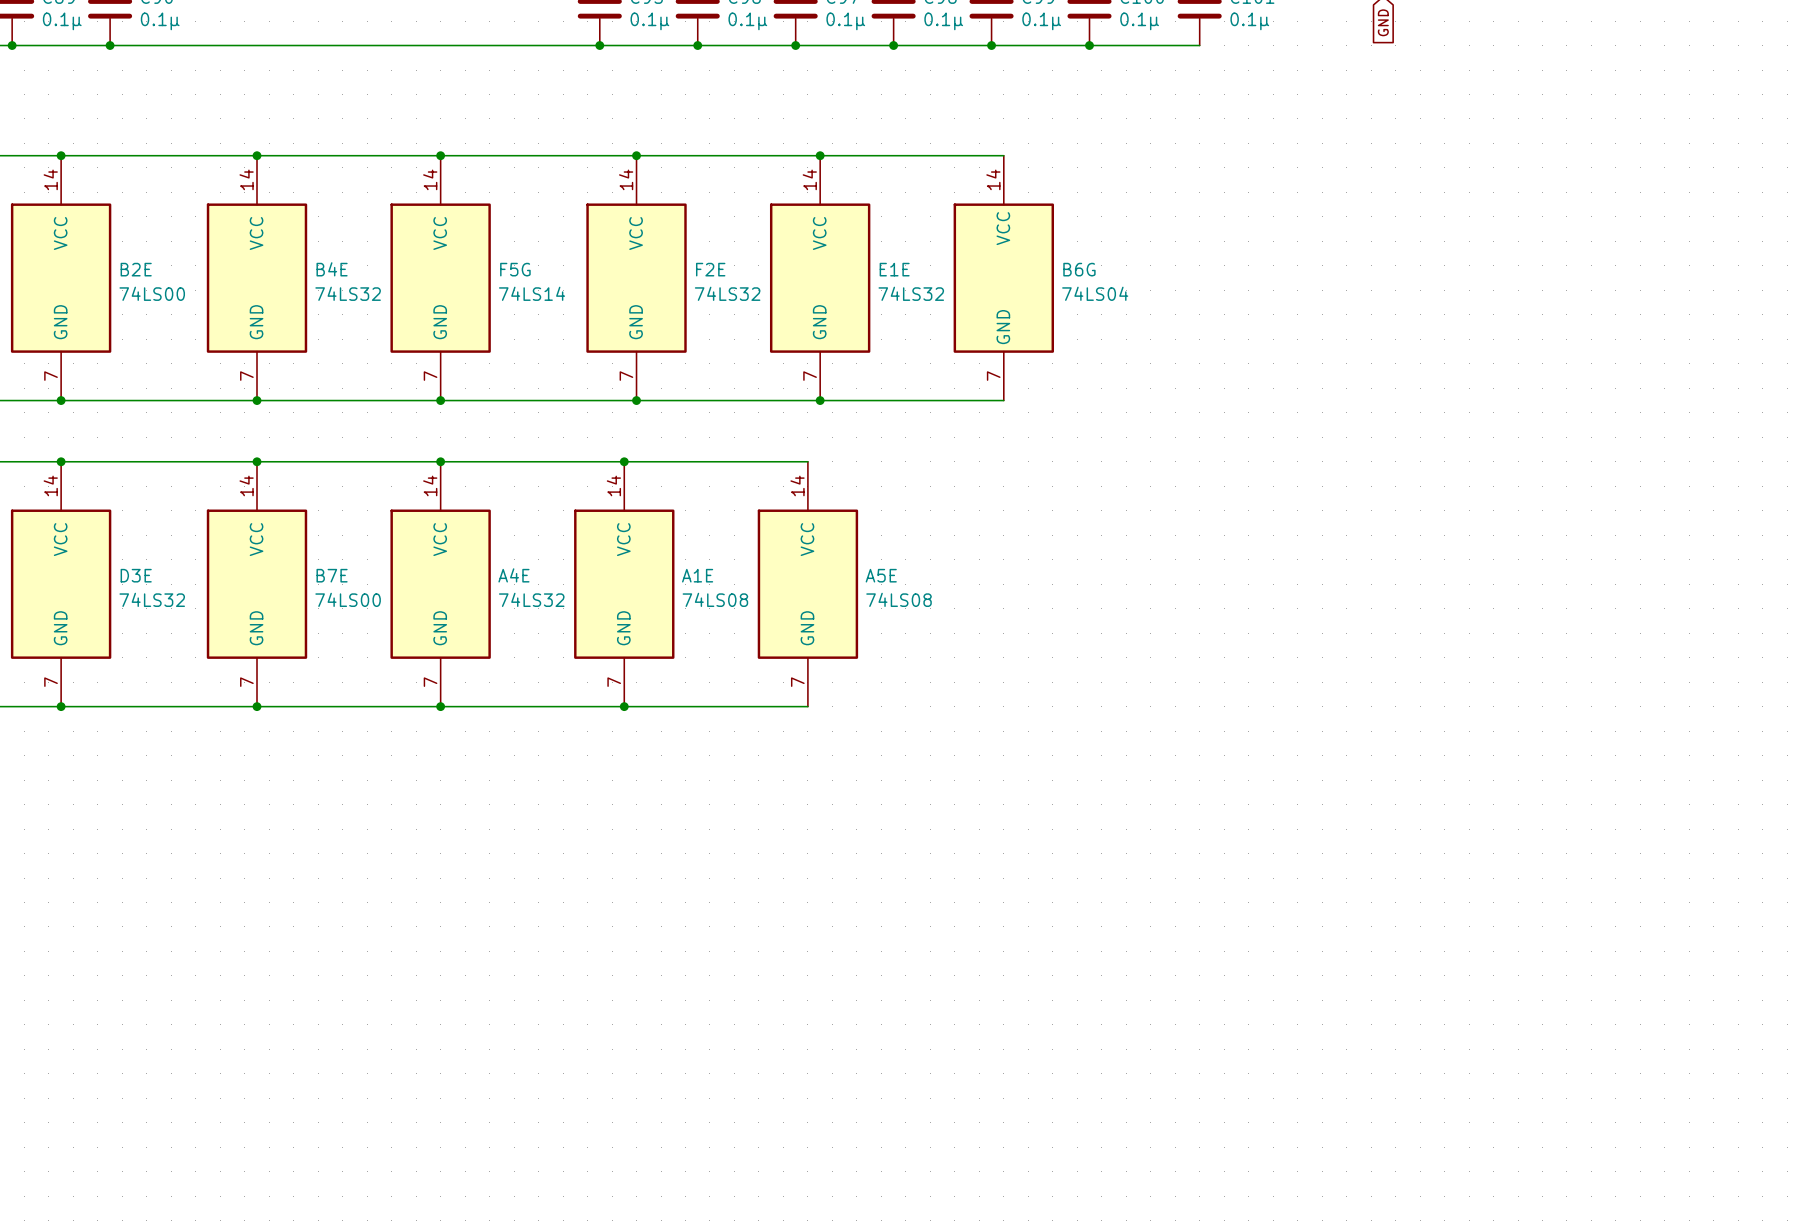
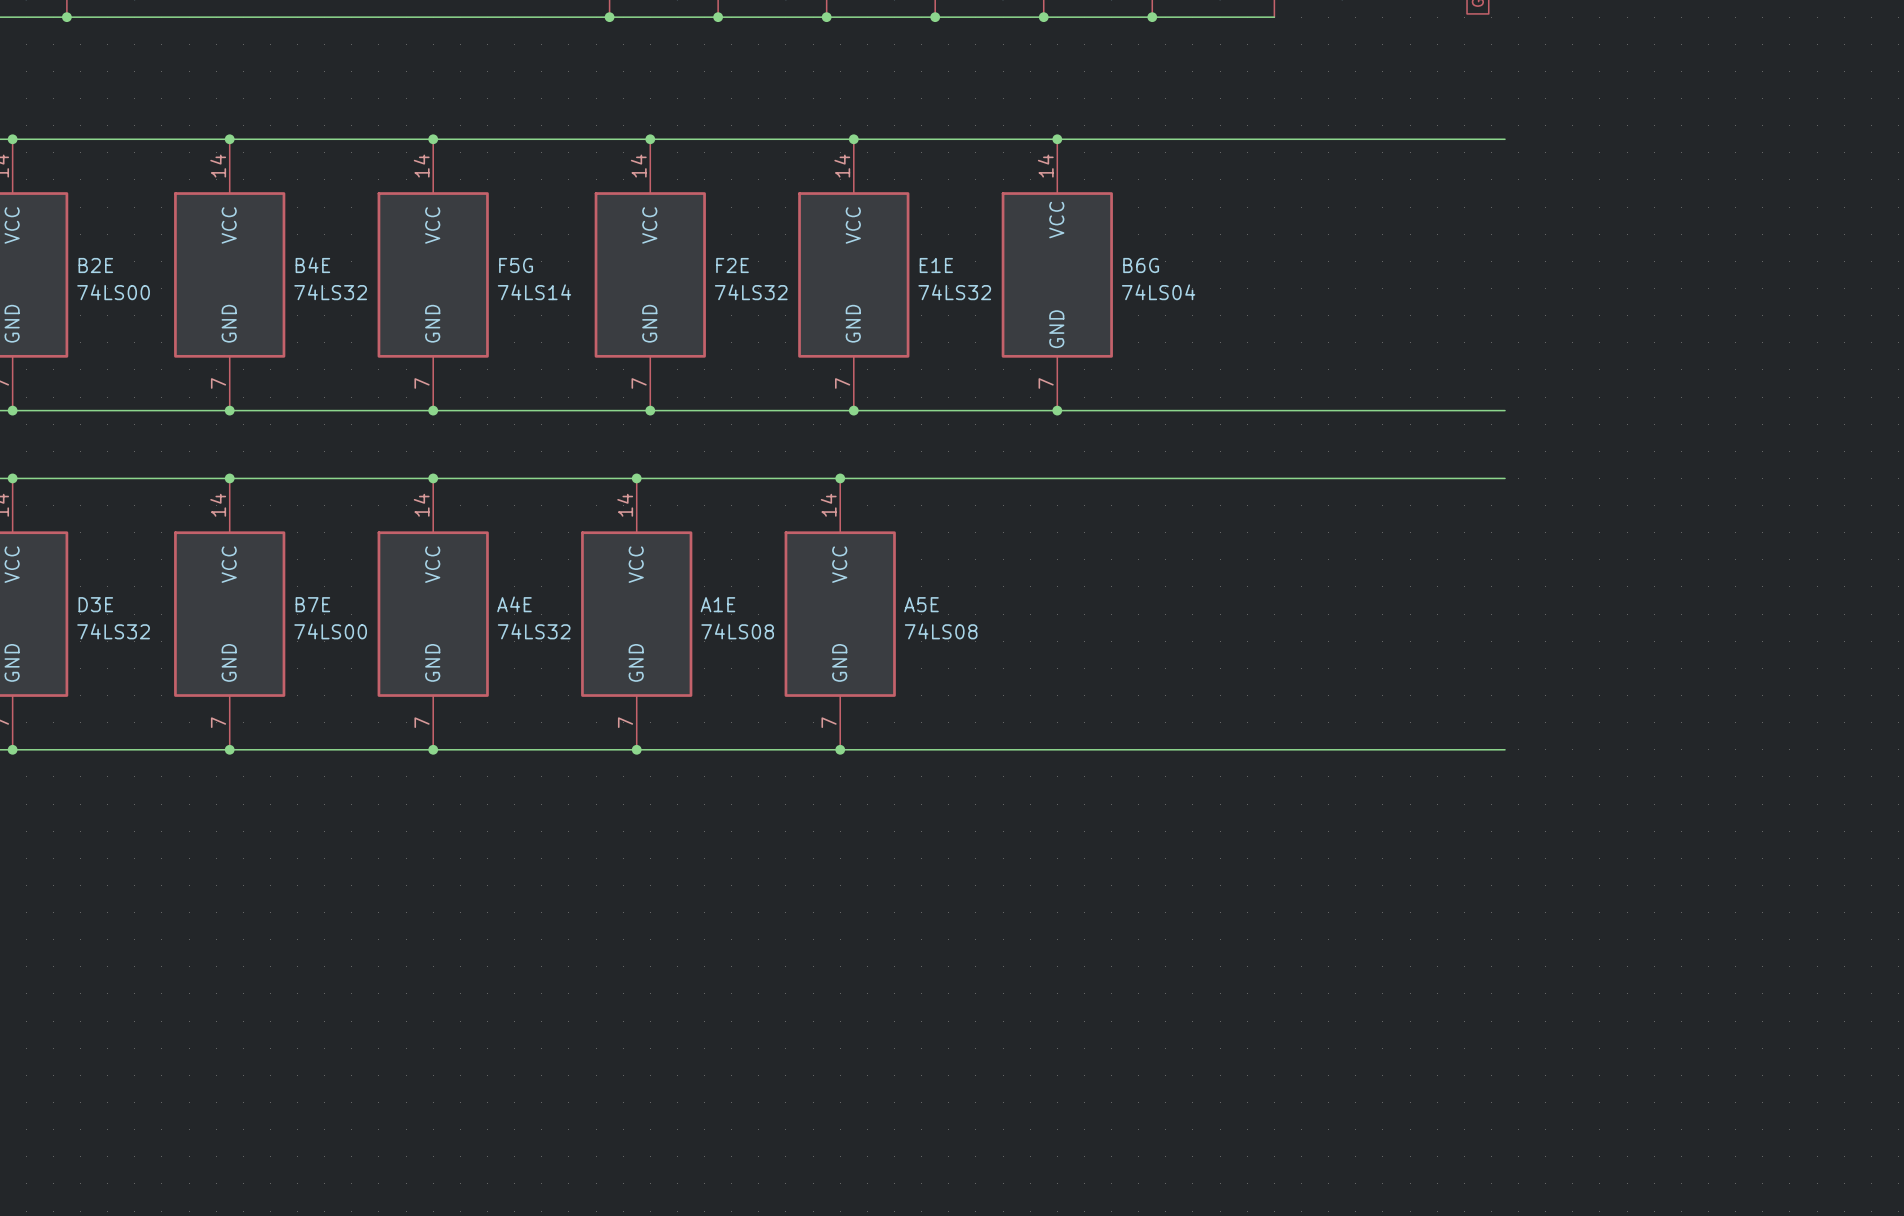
wire: none -> (1057, 139) (1505, 139)
junction: none -> (1057, 139)
wire: none -> (1057, 410) (1505, 410)
junction: none -> (1057, 410)
wire: none -> (840, 478) (1505, 478)
junction: none -> (840, 478)
wire: none -> (840, 749) (1505, 749)
junction: none -> (840, 749)

